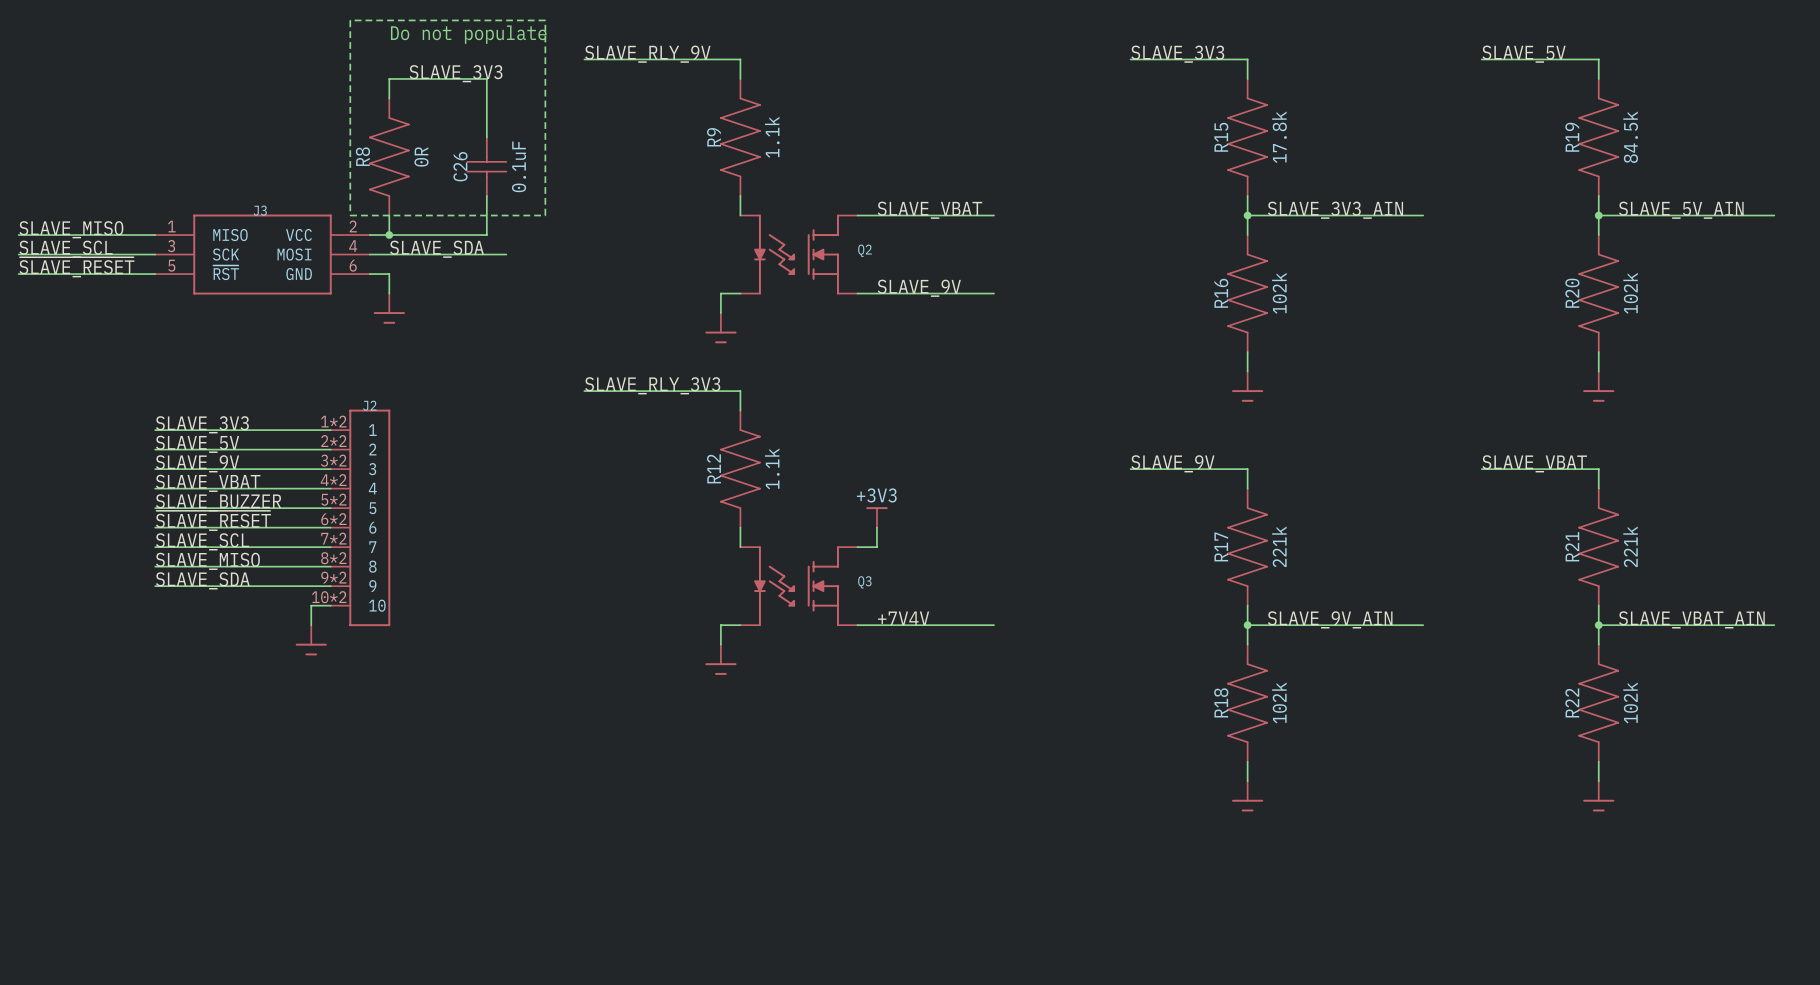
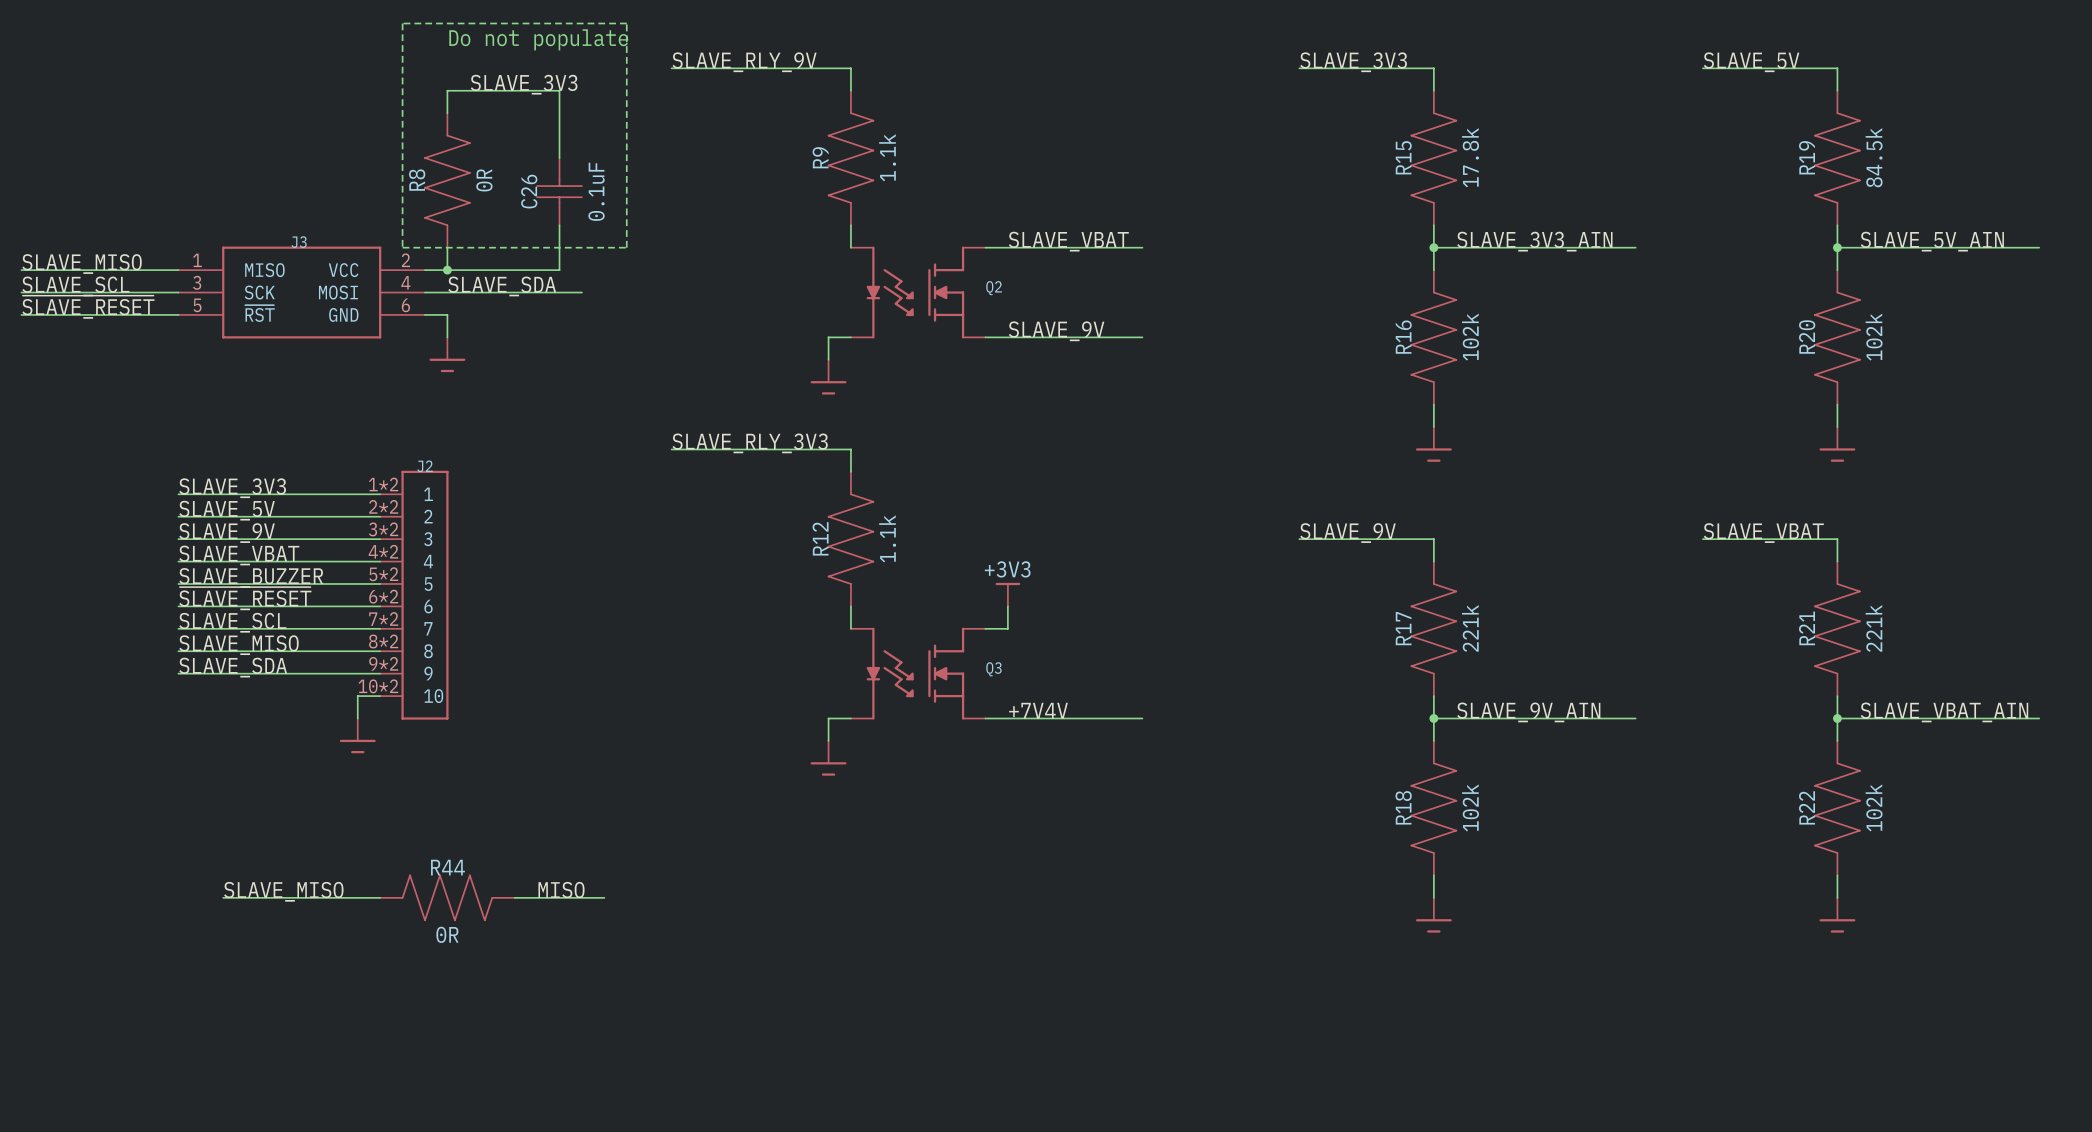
label: none -> MISO (561, 890)
label: none -> SLAVE_MISO (283, 891)
wire: none -> (223, 897) (380, 897)
R44: none -> 0R (447, 897)
wire: none -> (514, 897) (604, 897)

